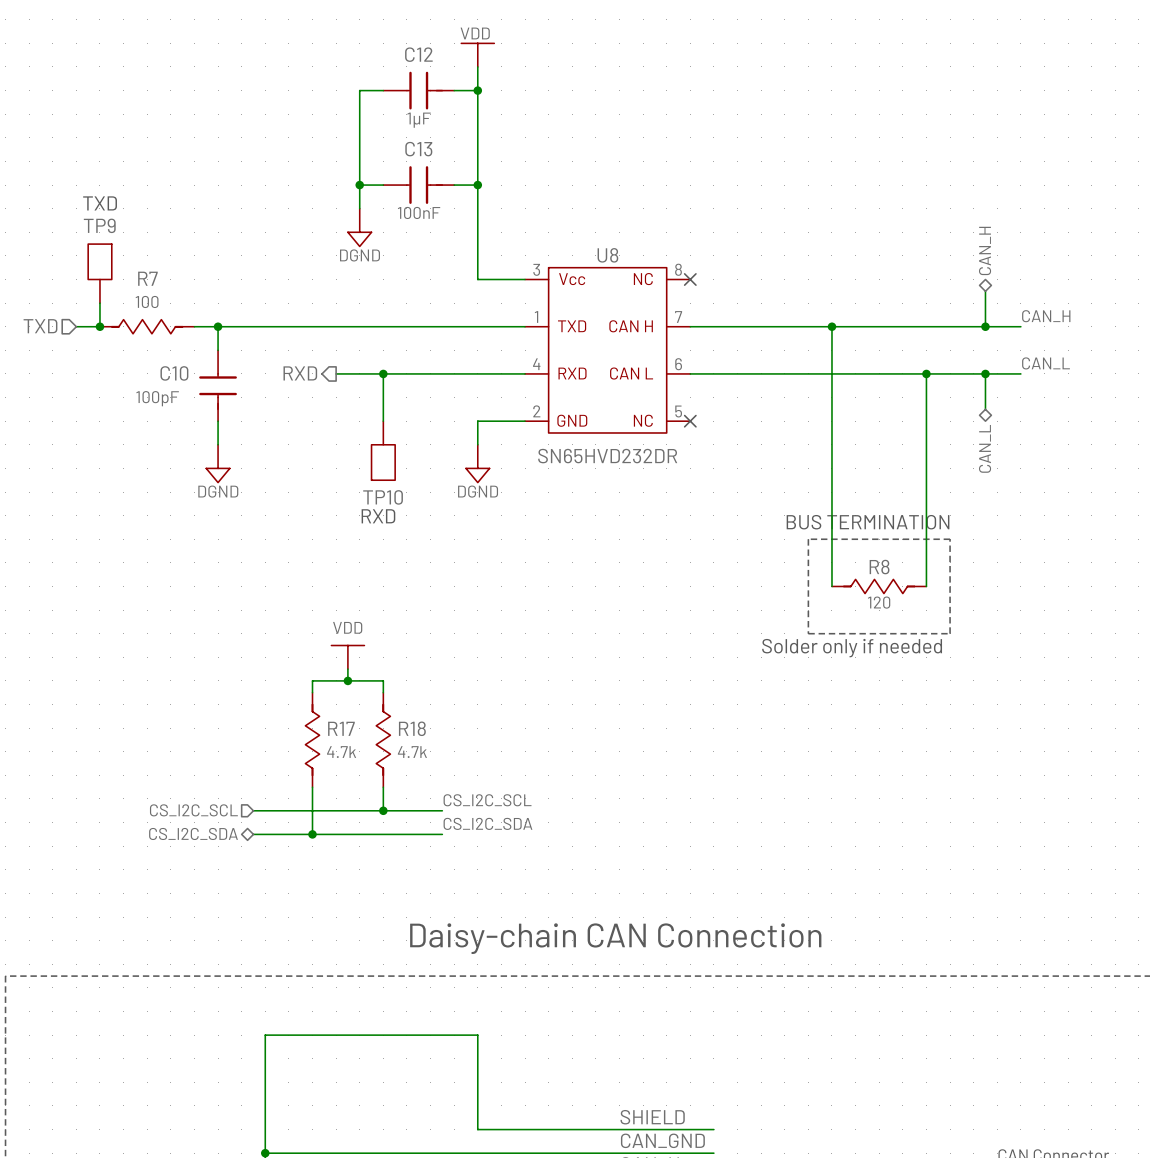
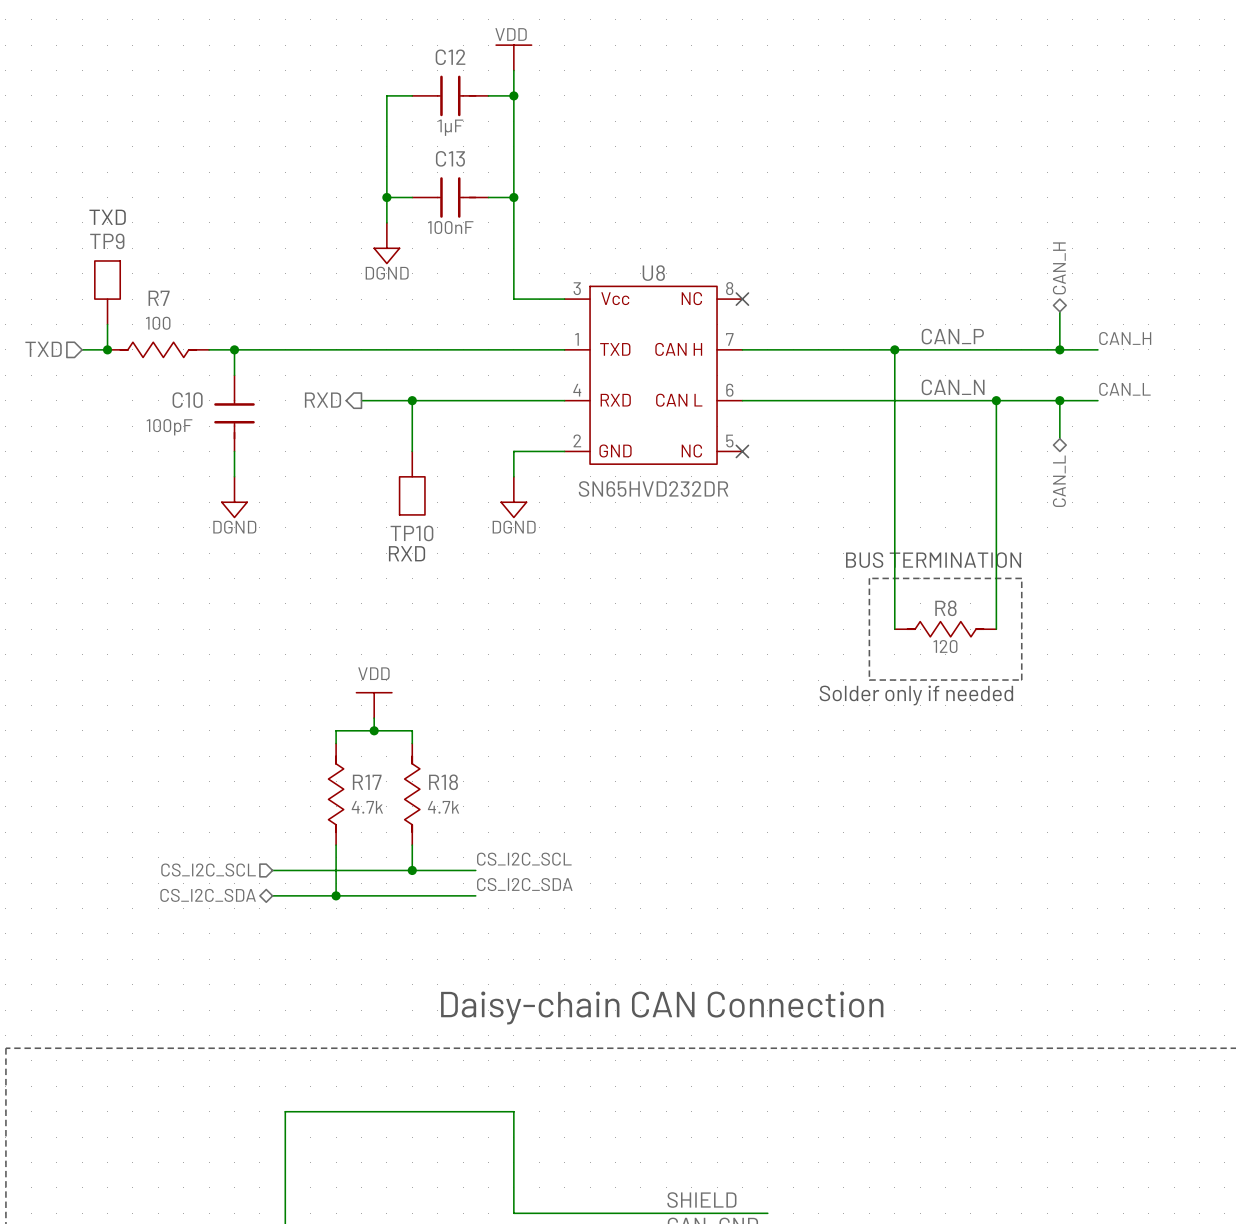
label: none -> CAN_P (952, 336)
label: none -> CAN_N (953, 387)

